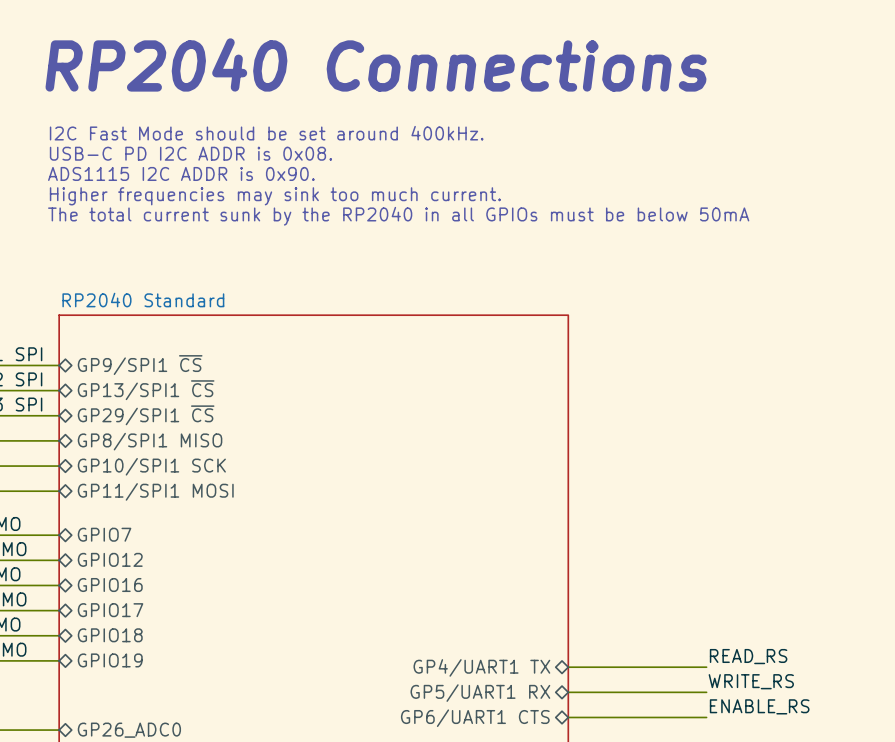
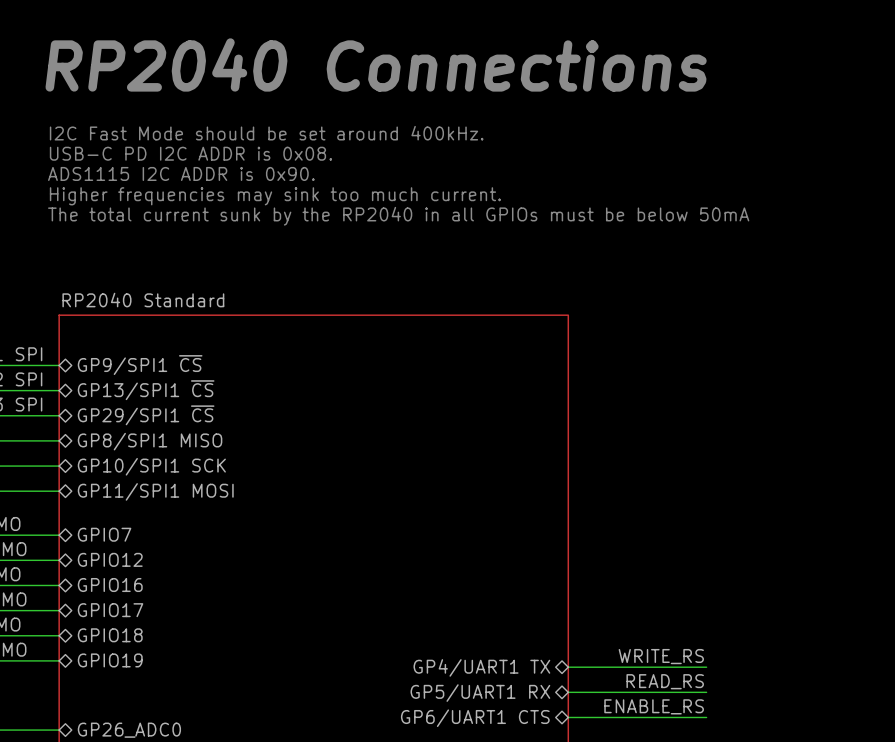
label: READ_RS (748, 656) -> WRITE_RS (661, 656)
label: WRITE_RS (751, 681) -> READ_RS (665, 681)
label position: ENABLE_RS (759, 706) -> ENABLE_RS (654, 706)

